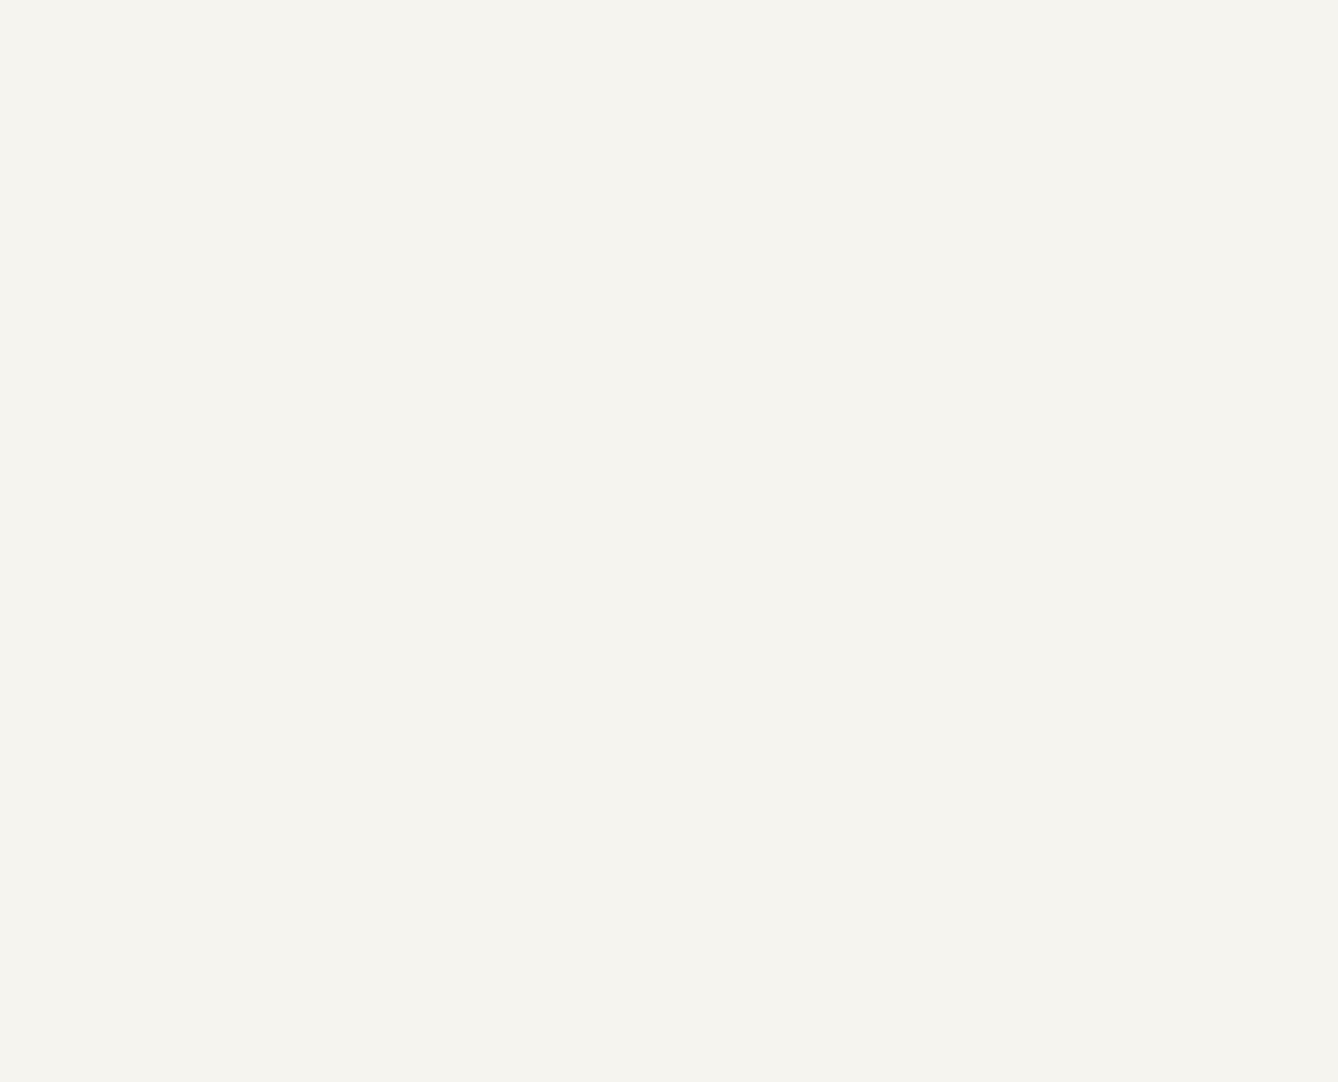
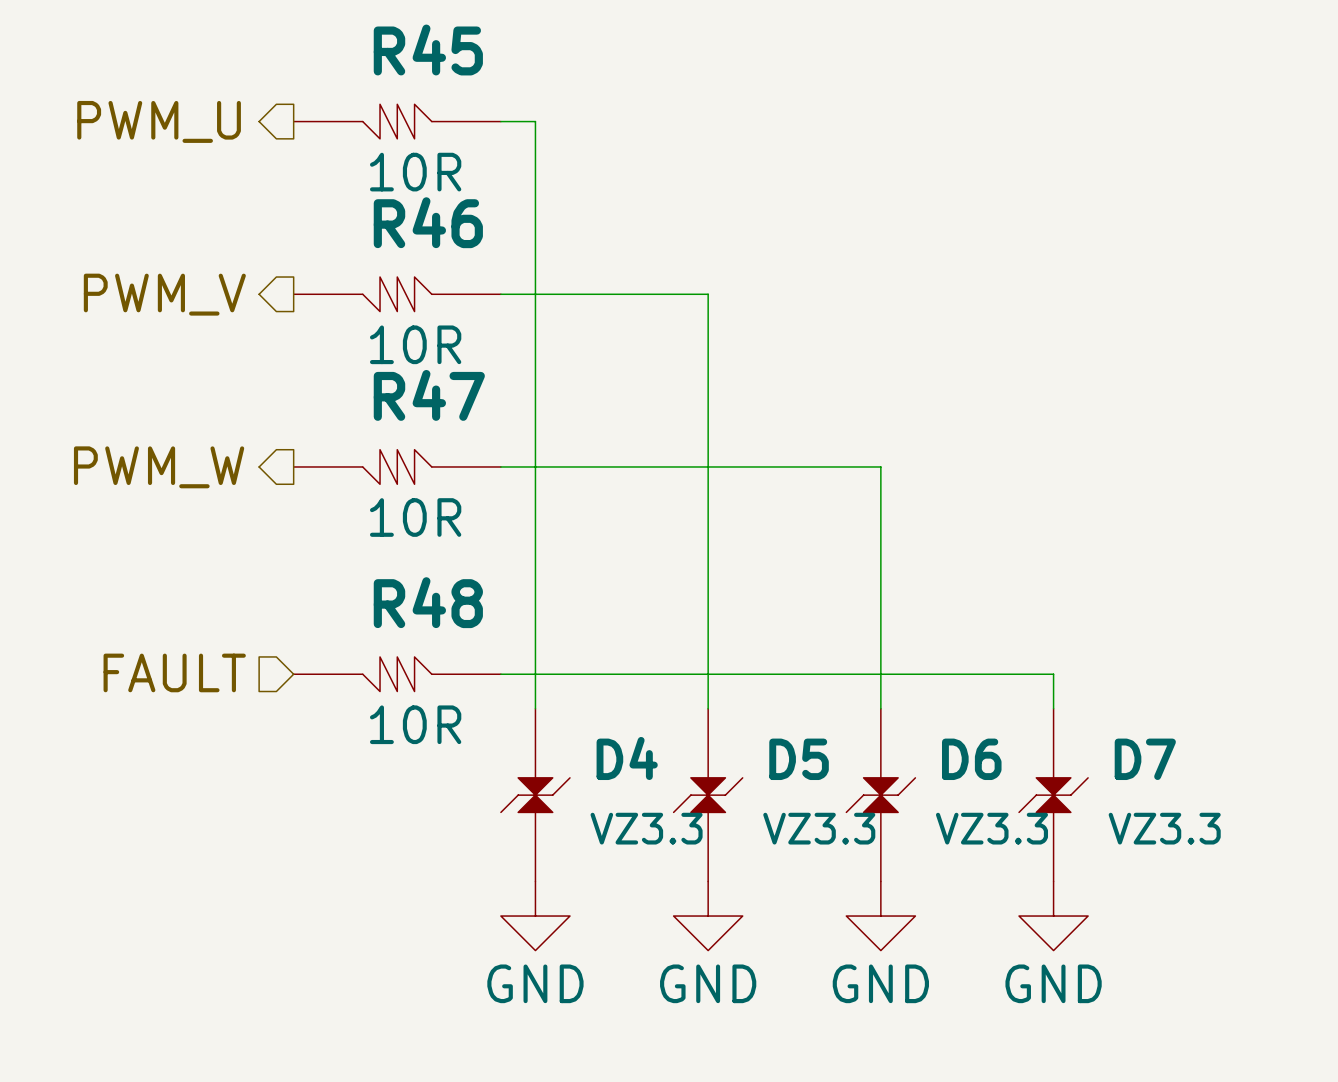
hierarchical label: none -> PWM_U (159, 121)
R45: none -> 10R (397, 121)
wire: none -> (500, 121) (535, 121) (535, 708)
hierarchical label: none -> PWM_V (164, 294)
R46: none -> 10R (397, 294)
wire: none -> (500, 294) (708, 294) (708, 708)
R47: none -> 10R (397, 466)
wire: none -> (500, 466) (880, 466) (880, 708)
hierarchical label: none -> PWM_W (159, 467)
hierarchical label: none -> FAULT (174, 672)
R48: none -> 10R (397, 674)
wire: none -> (500, 674) (1053, 674) (1053, 708)
D4: none -> VZ3.3 (535, 795)
D5: none -> VZ3.3 (708, 795)
D6: none -> VZ3.3 (880, 795)
D7: none -> VZ3.3 (1053, 795)
power symbol: none -> GND (535, 916)
power symbol: none -> GND (708, 916)
power symbol: none -> GND (880, 916)
power symbol: none -> GND (1053, 916)

